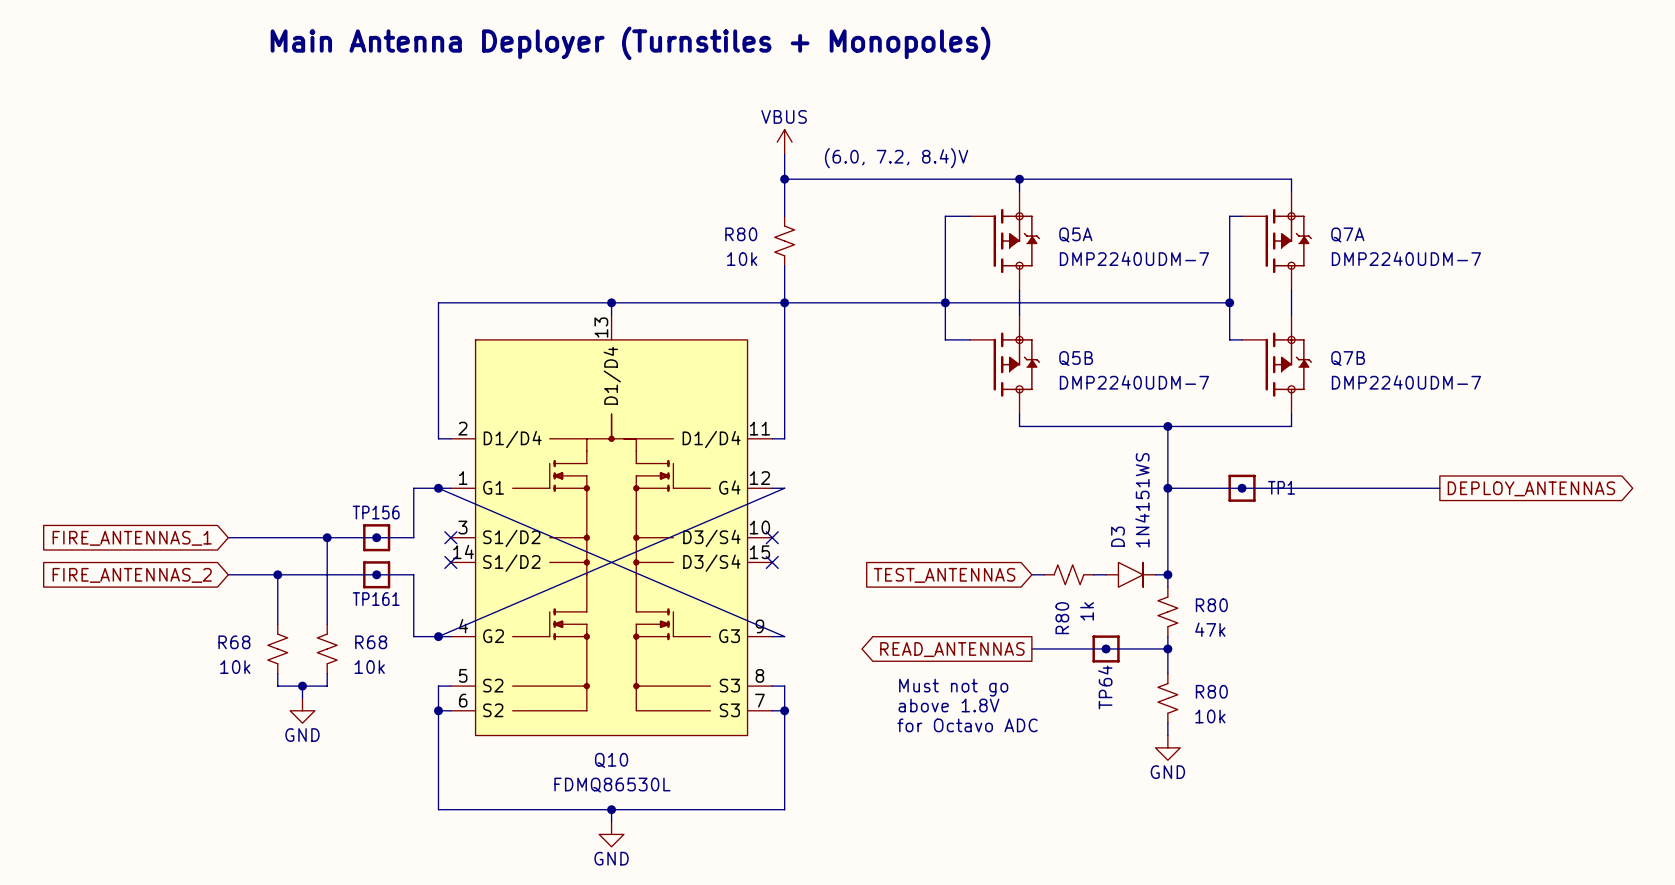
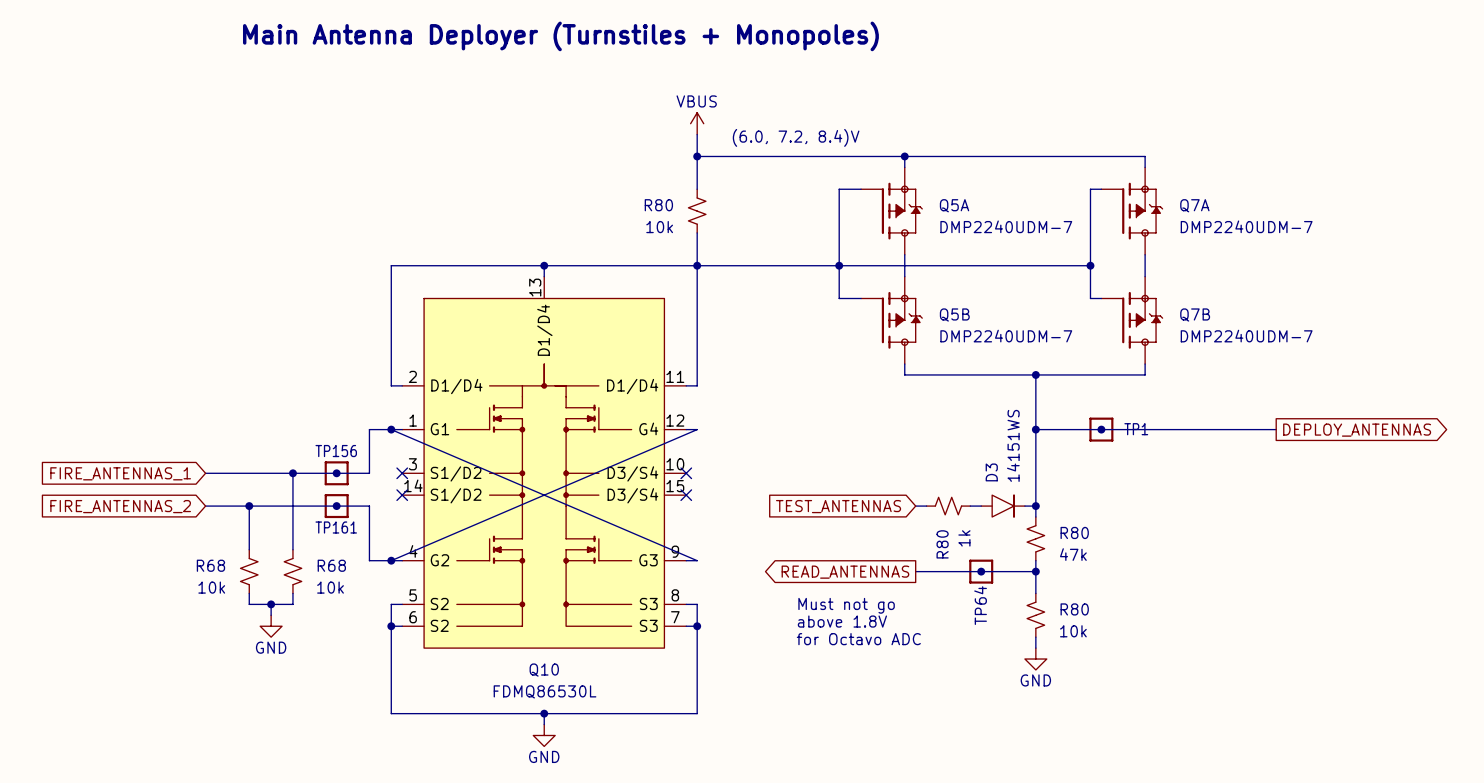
D3 value: 1N4151WS (1142, 500) -> 14151WS (1013, 445)

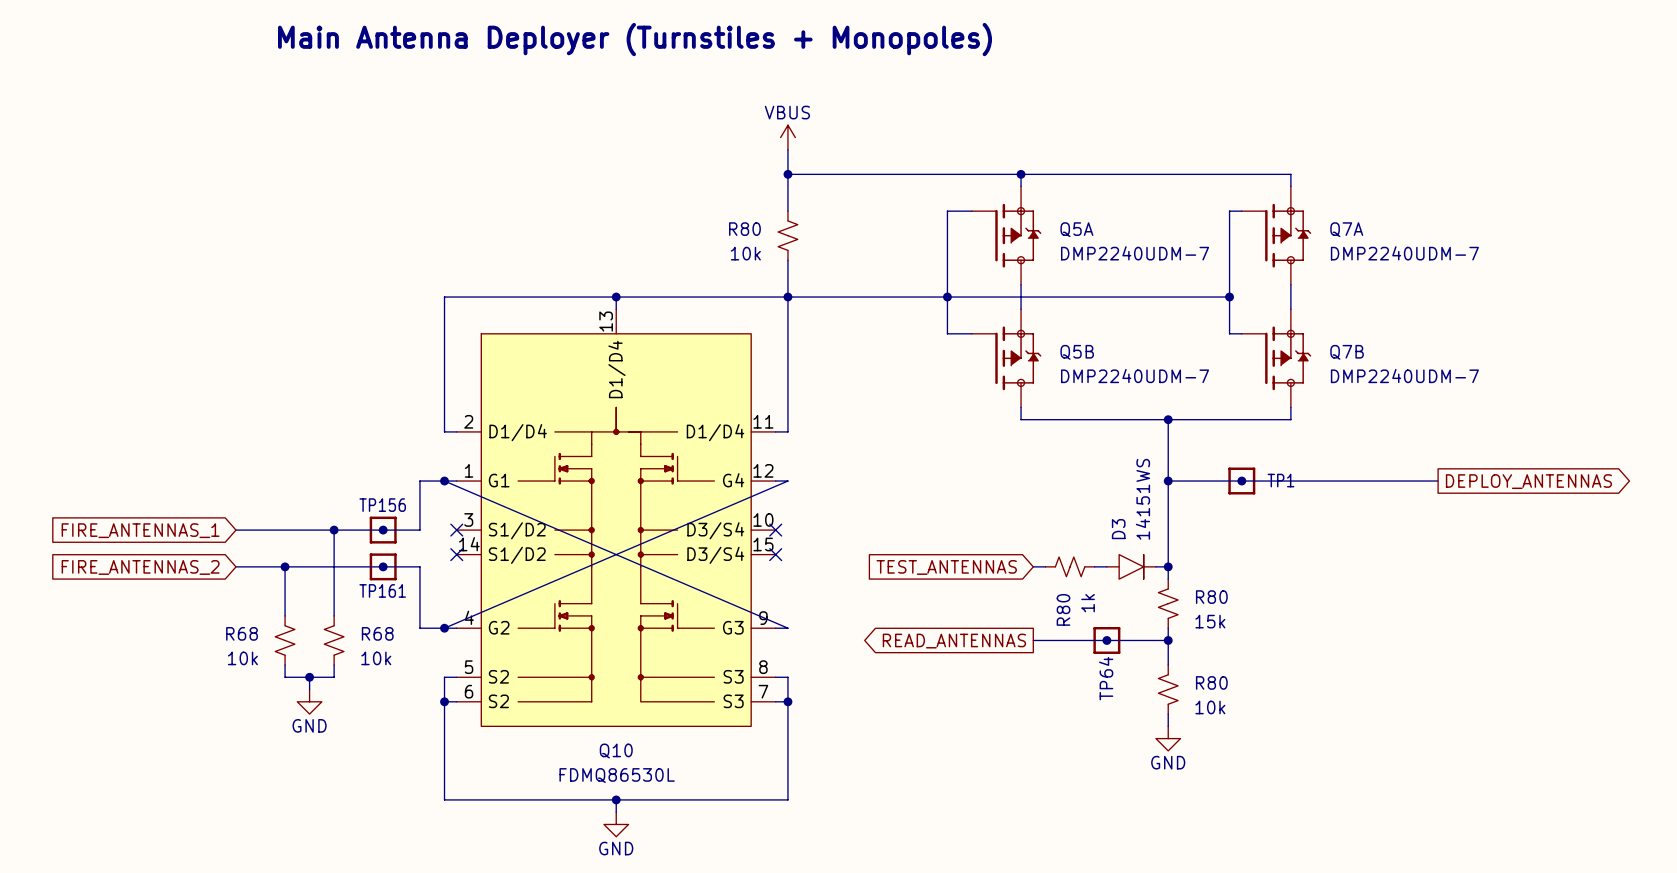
text: (6.0, 7.2, 8.4)V (796, 137) -> none
R80 value: 47k (1073, 554) -> 15k (1210, 621)
text: Must not go (846, 605) -> none
text: above 1.8V (842, 621) -> none
text: for Octavo ADC (858, 639) -> none

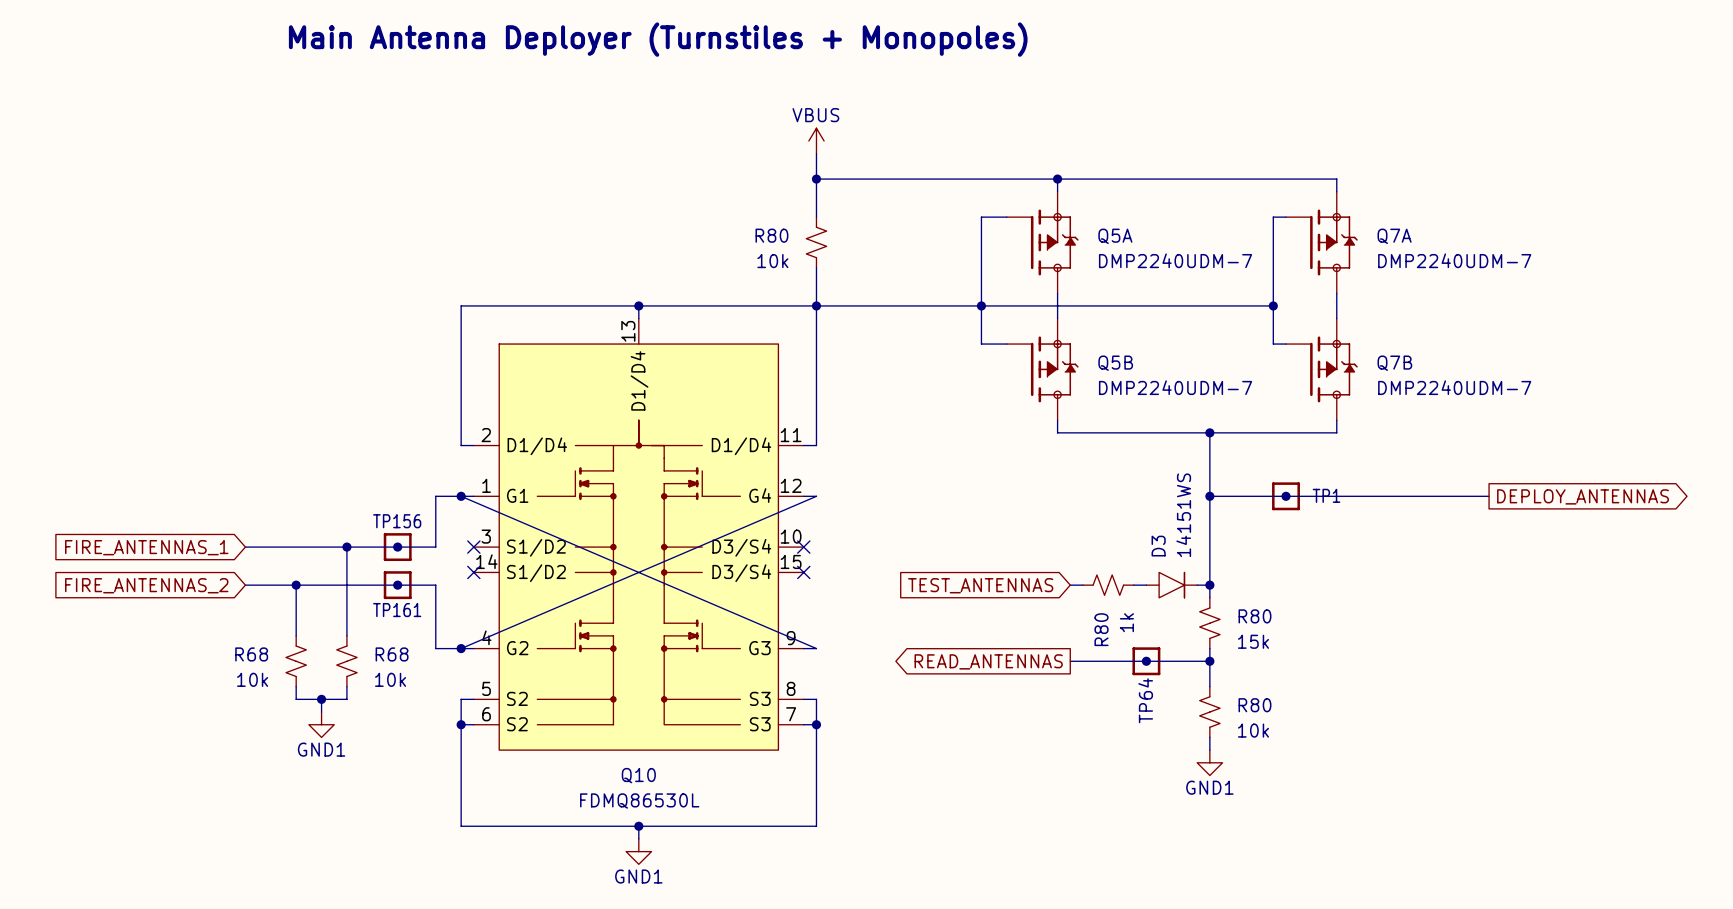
power symbol: GND (309, 701) -> GND1 (321, 724)
power symbol: GND (1168, 738) -> GND1 (1209, 762)
power symbol: GND (616, 824) -> GND1 (638, 851)

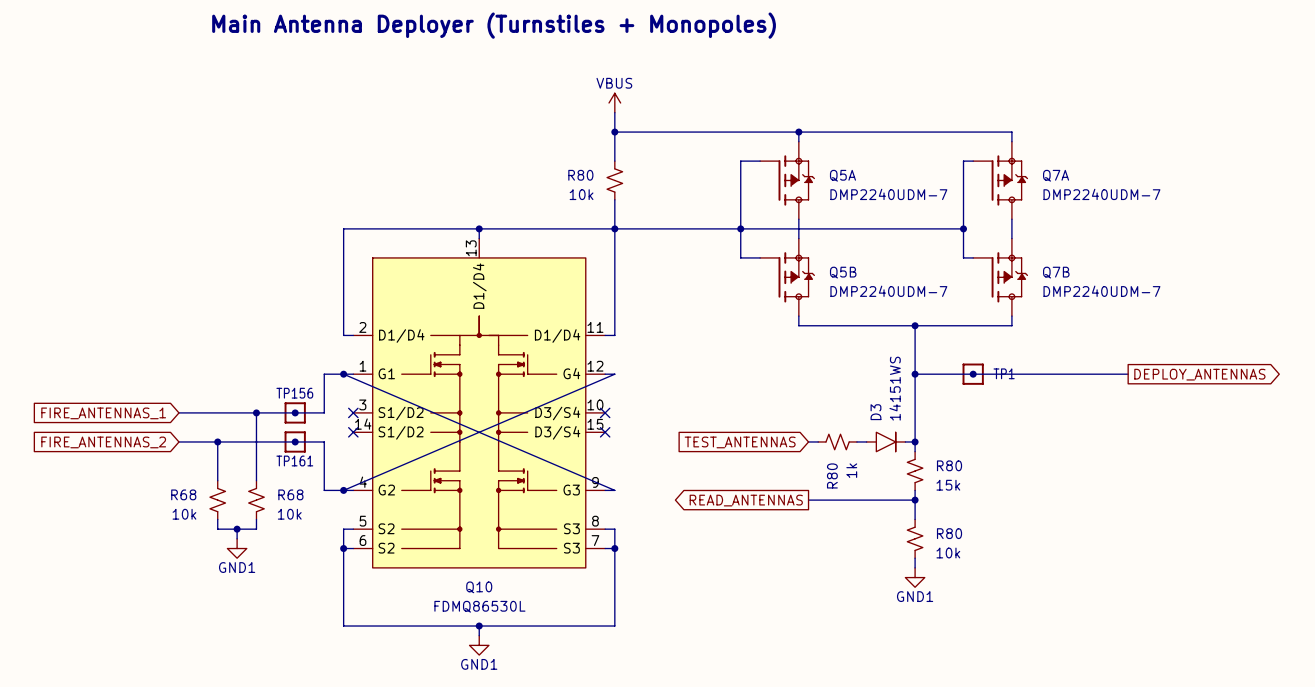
junction: (1146, 661) -> none
TP64: (1146, 661) -> none

